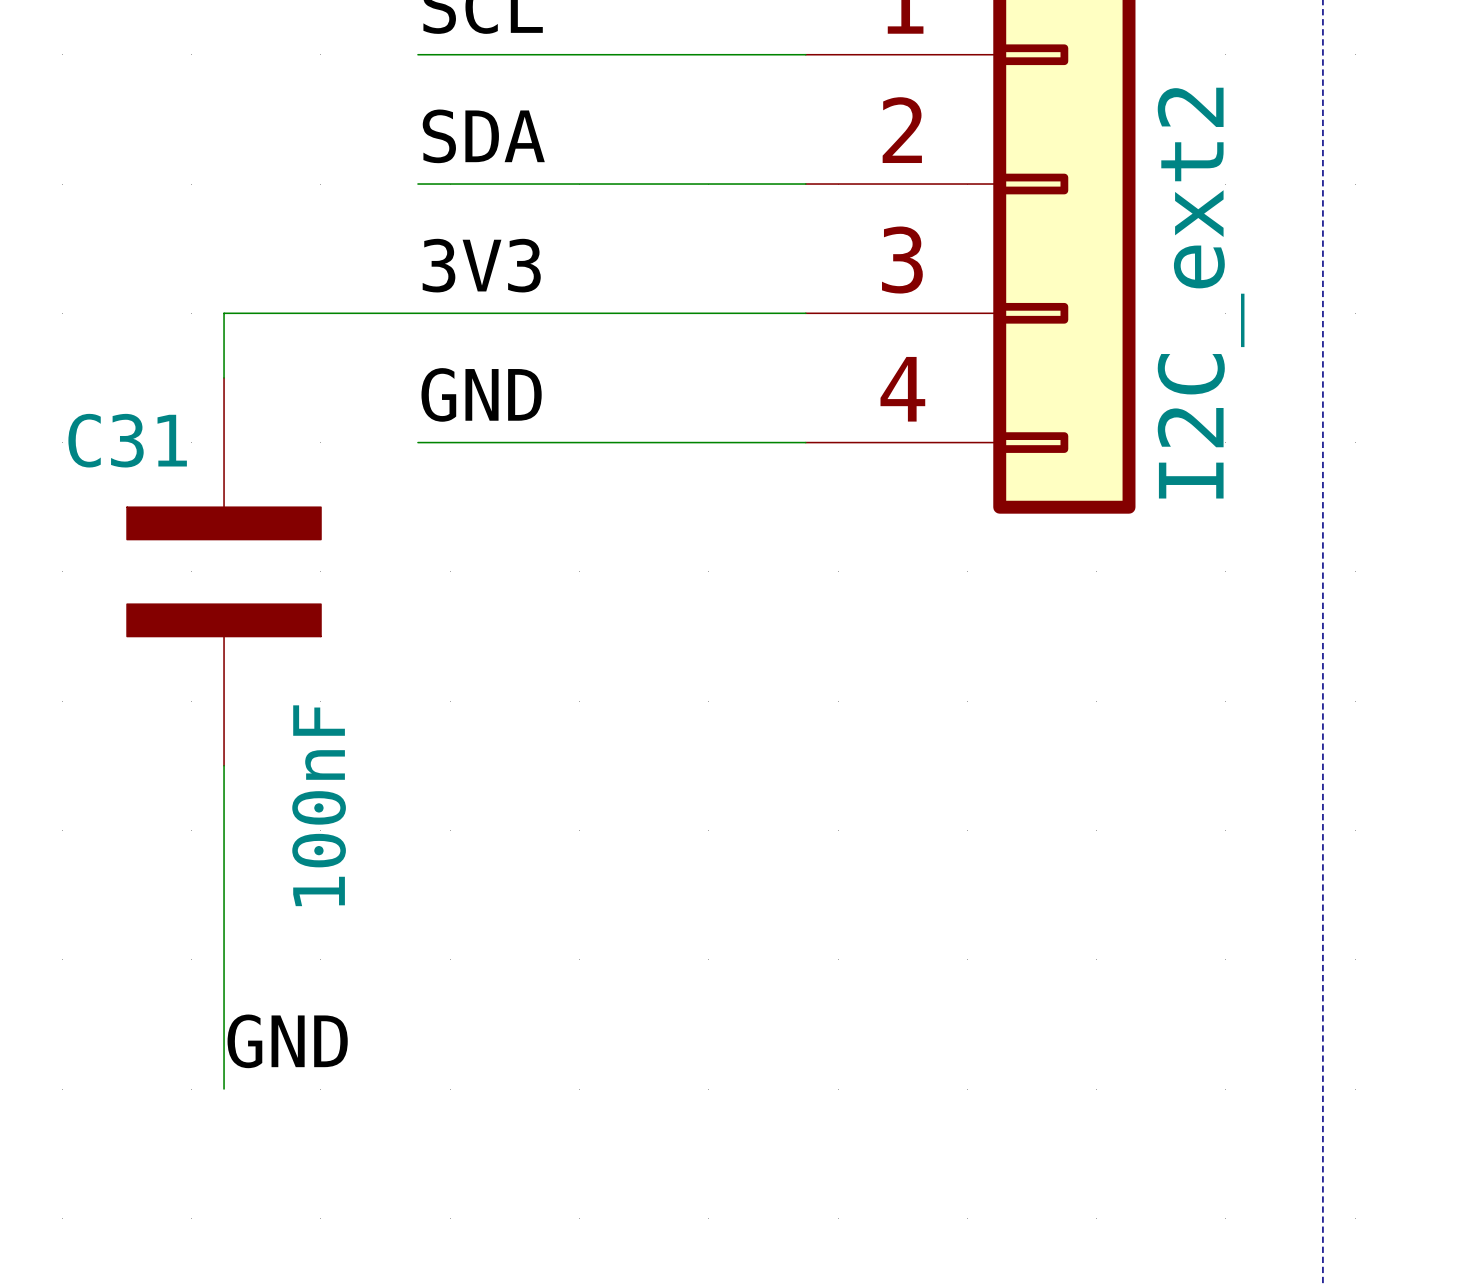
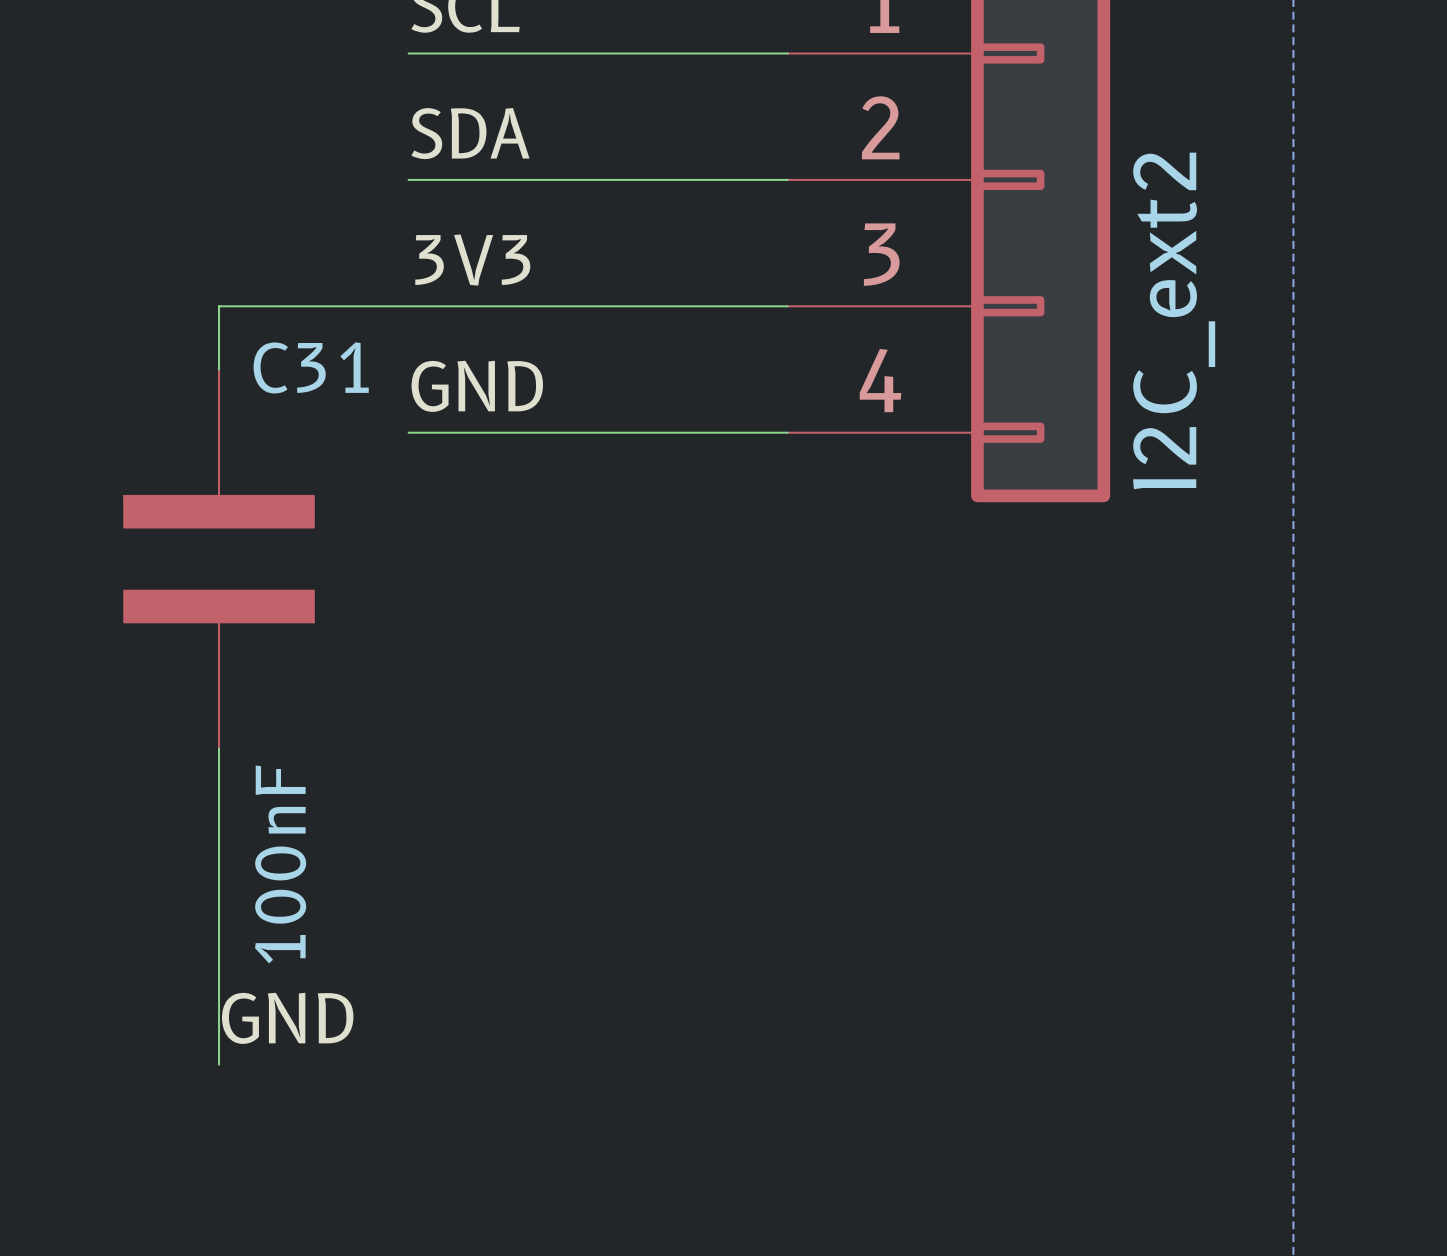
C31 name position: C31 (127, 440) -> C31 (311, 367)
C31 value position: 100nF (319, 805) -> 100nF (280, 864)

